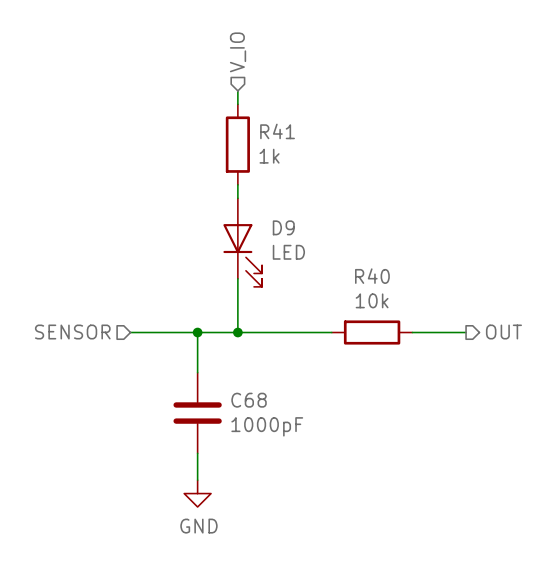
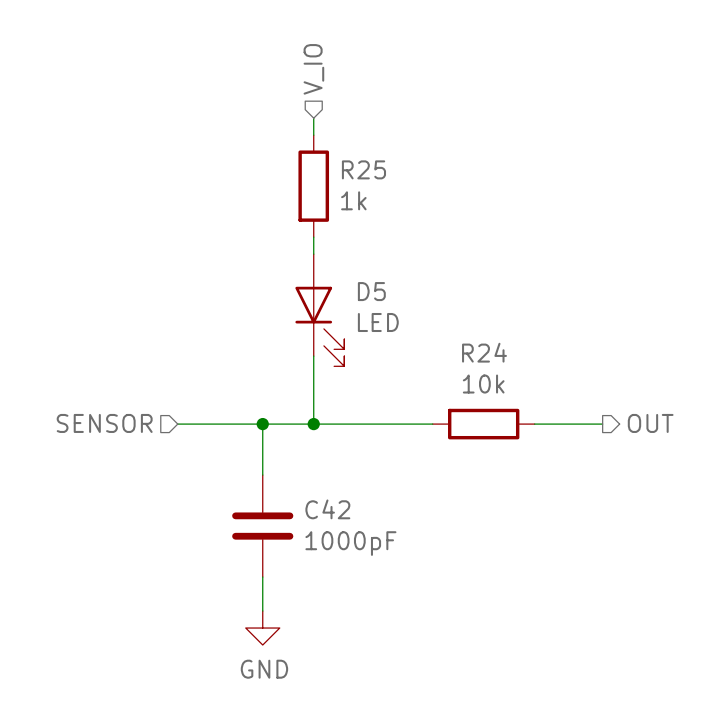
R41 name: R41 (277, 131) -> R25 (363, 169)
D9 name: D9 (283, 227) -> D5 (371, 291)
R40 name: R40 (372, 276) -> R24 (484, 352)
C68 name: C68 (249, 400) -> C42 (327, 509)

